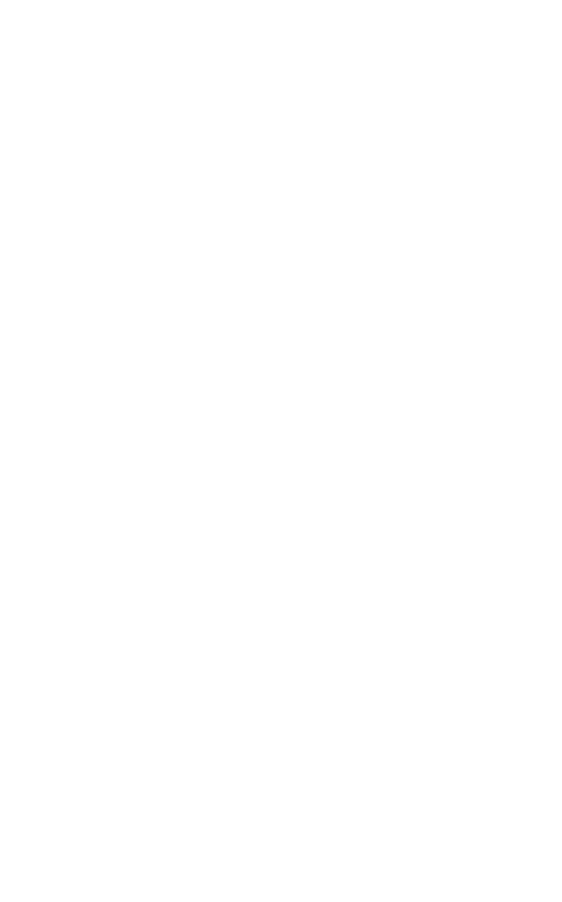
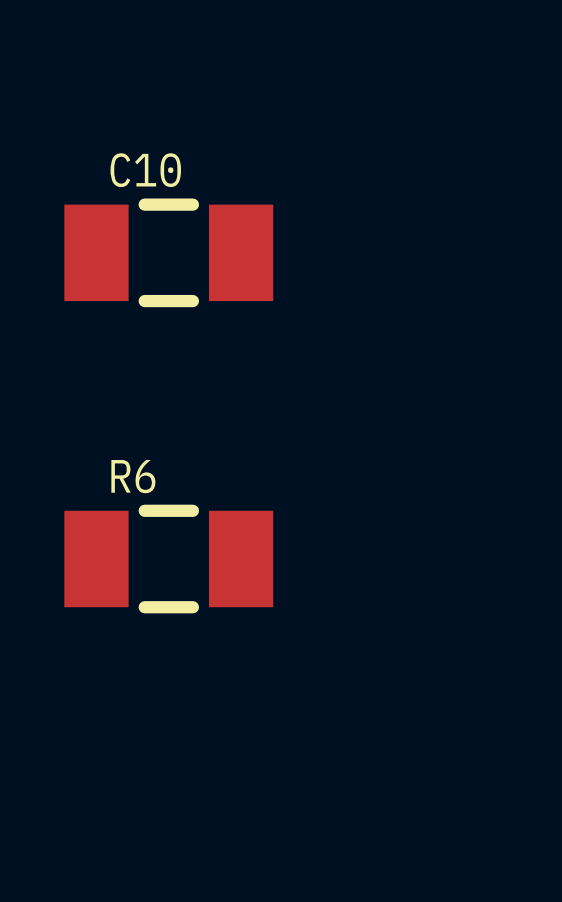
C10: none -> (168, 252)
R6: none -> (168, 559)

